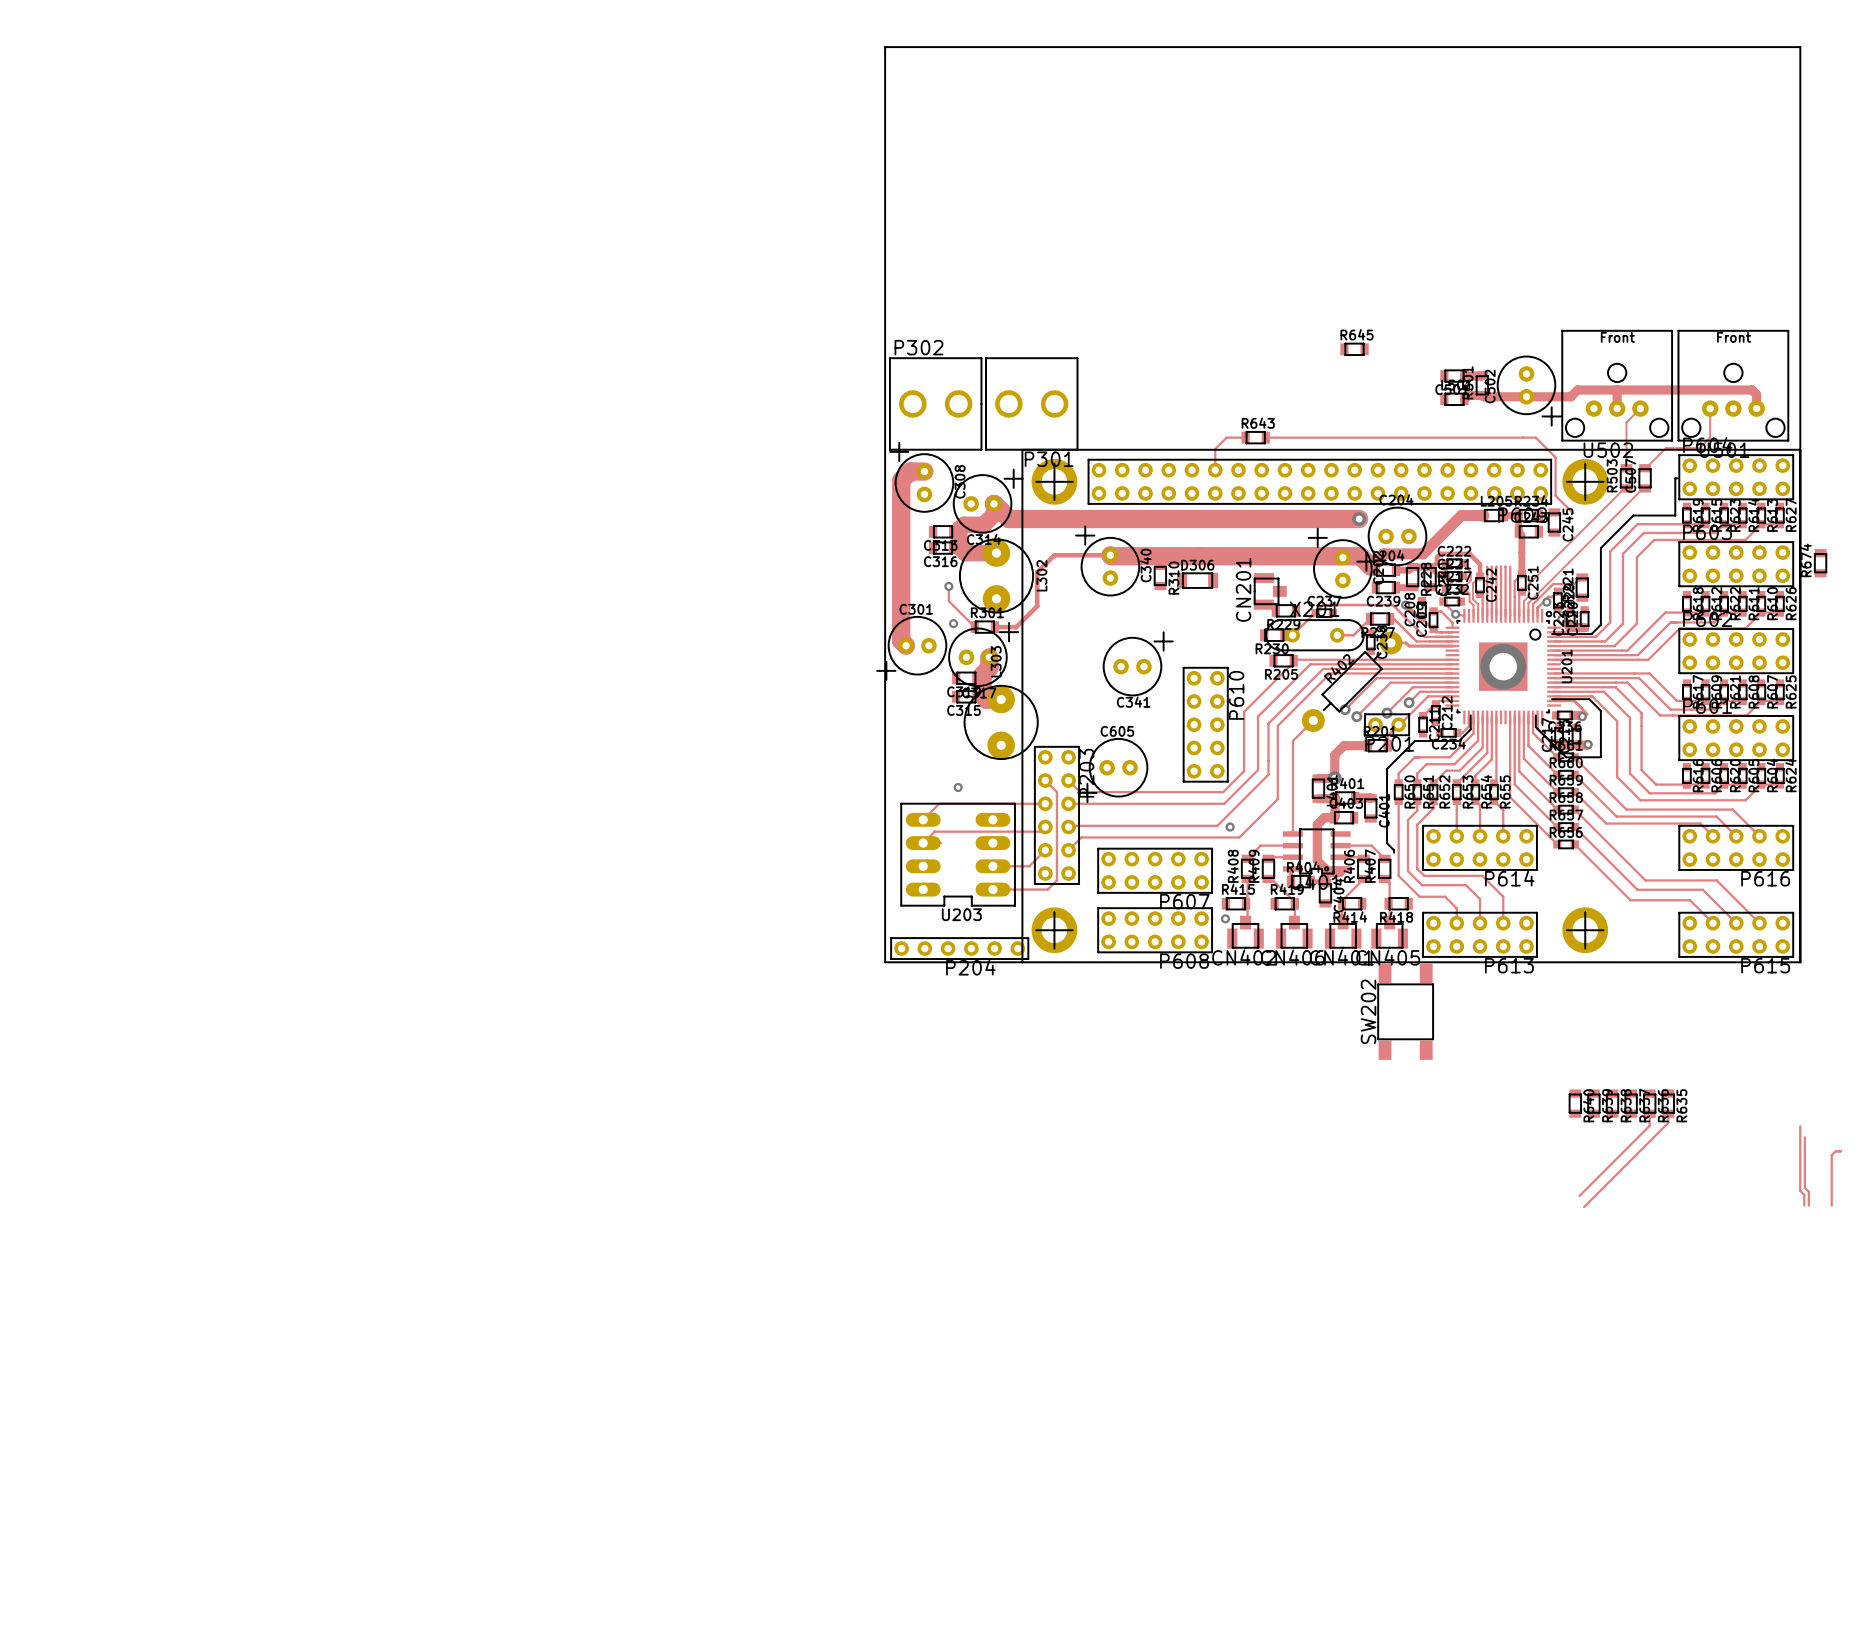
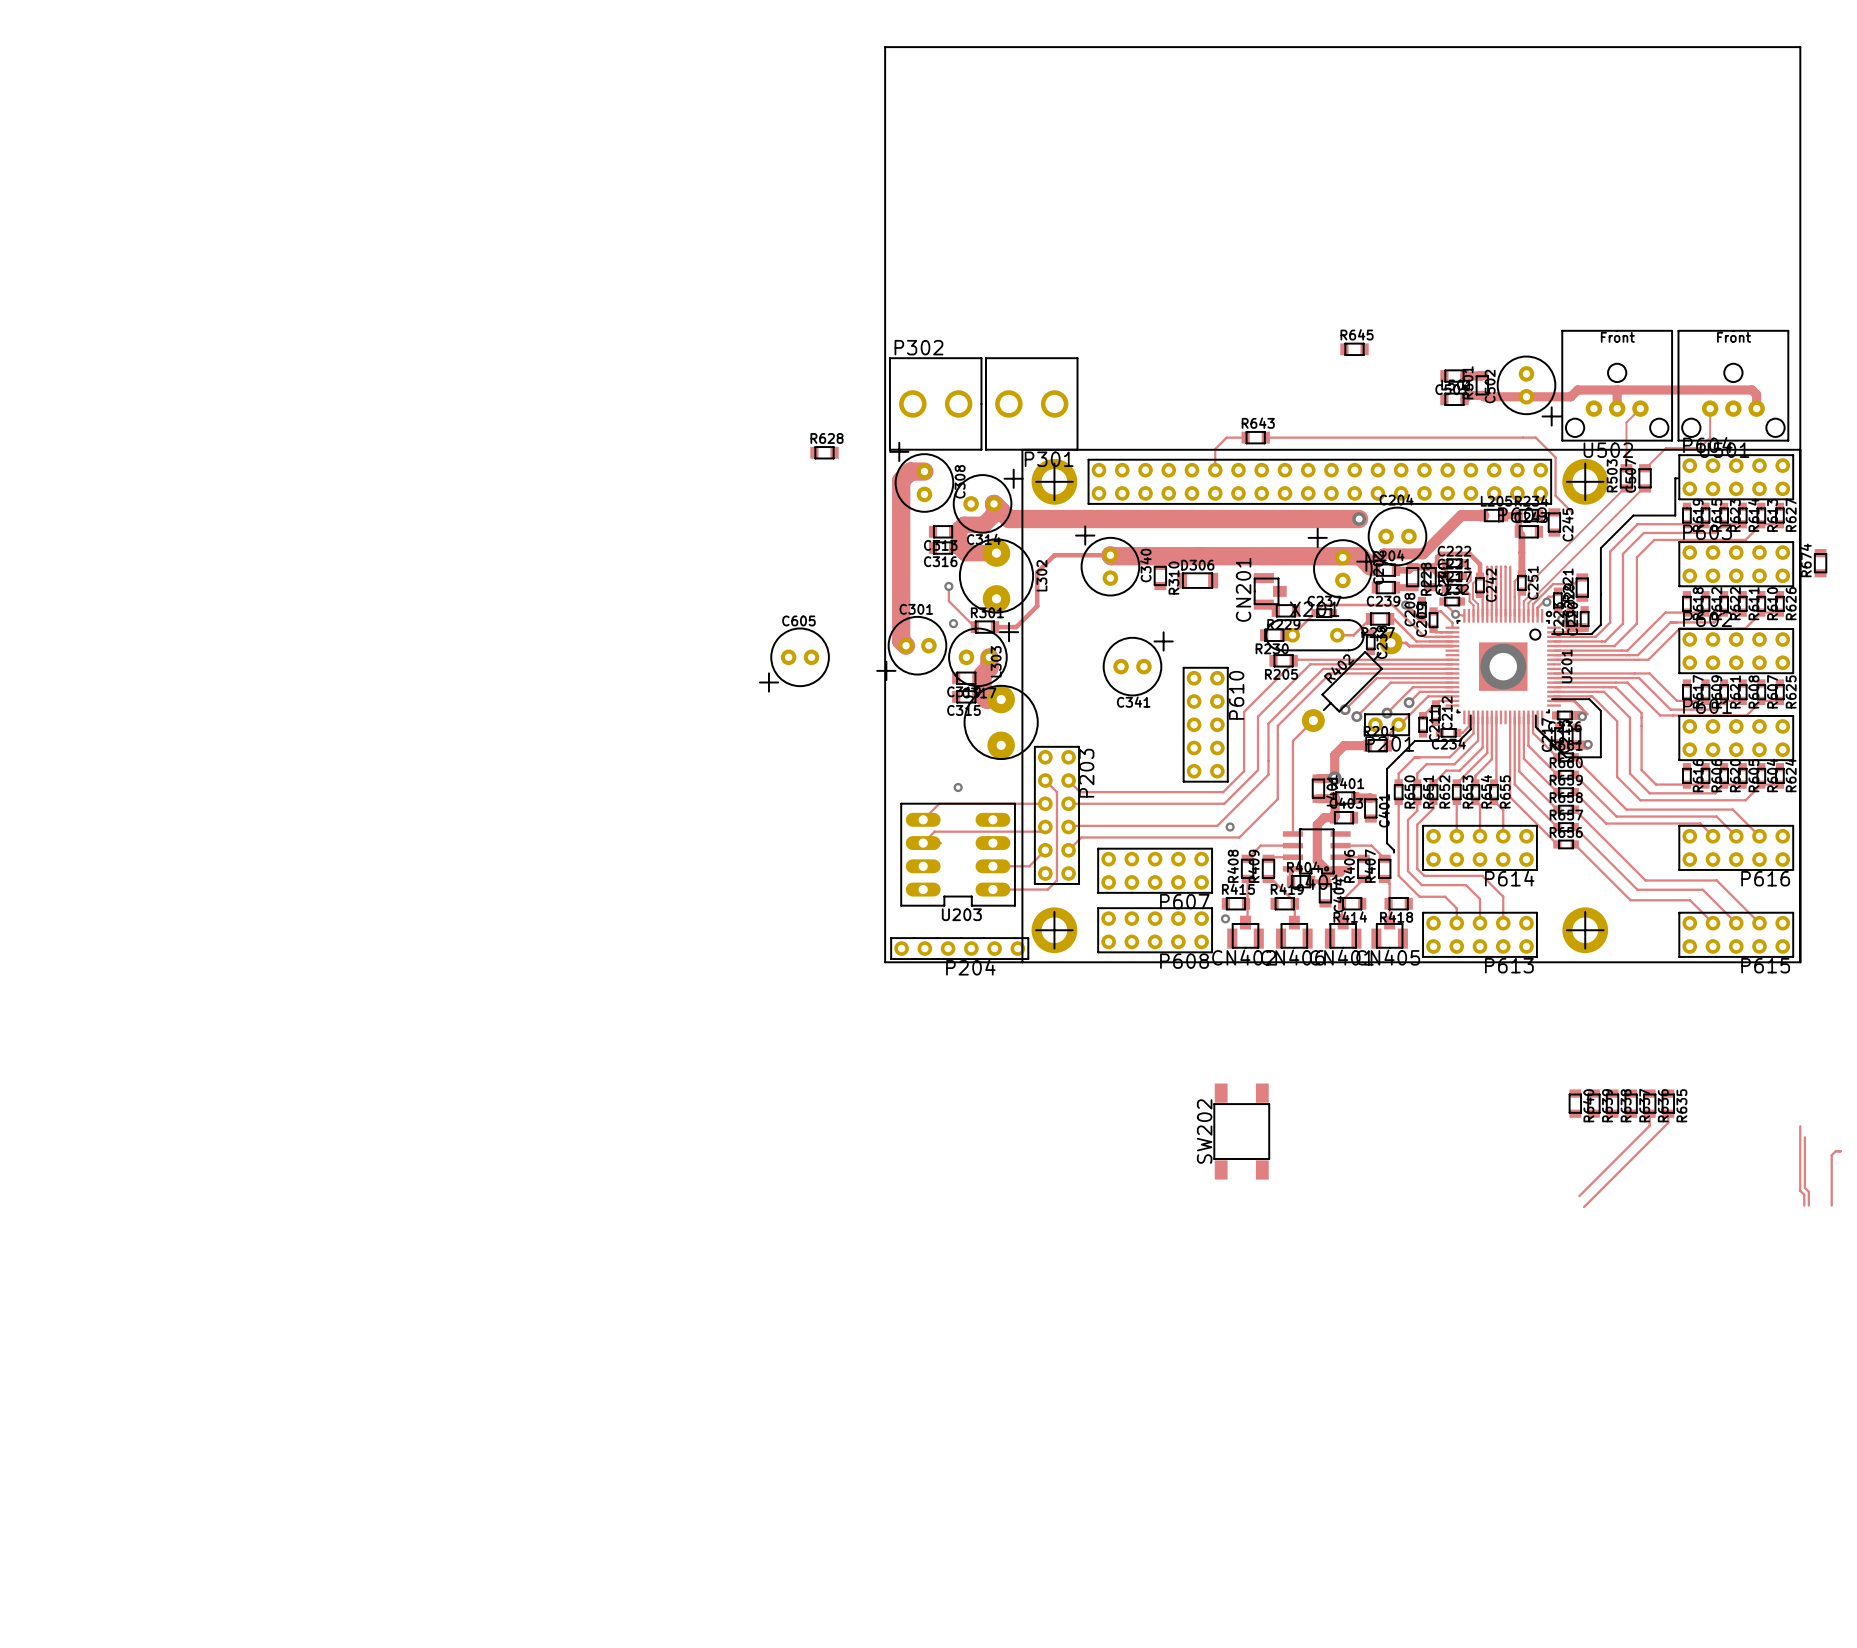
R628: none -> (824, 452)
C605 position: (1112, 770) -> (794, 660)
SW202 position: (1405, 1011) -> (1241, 1131)

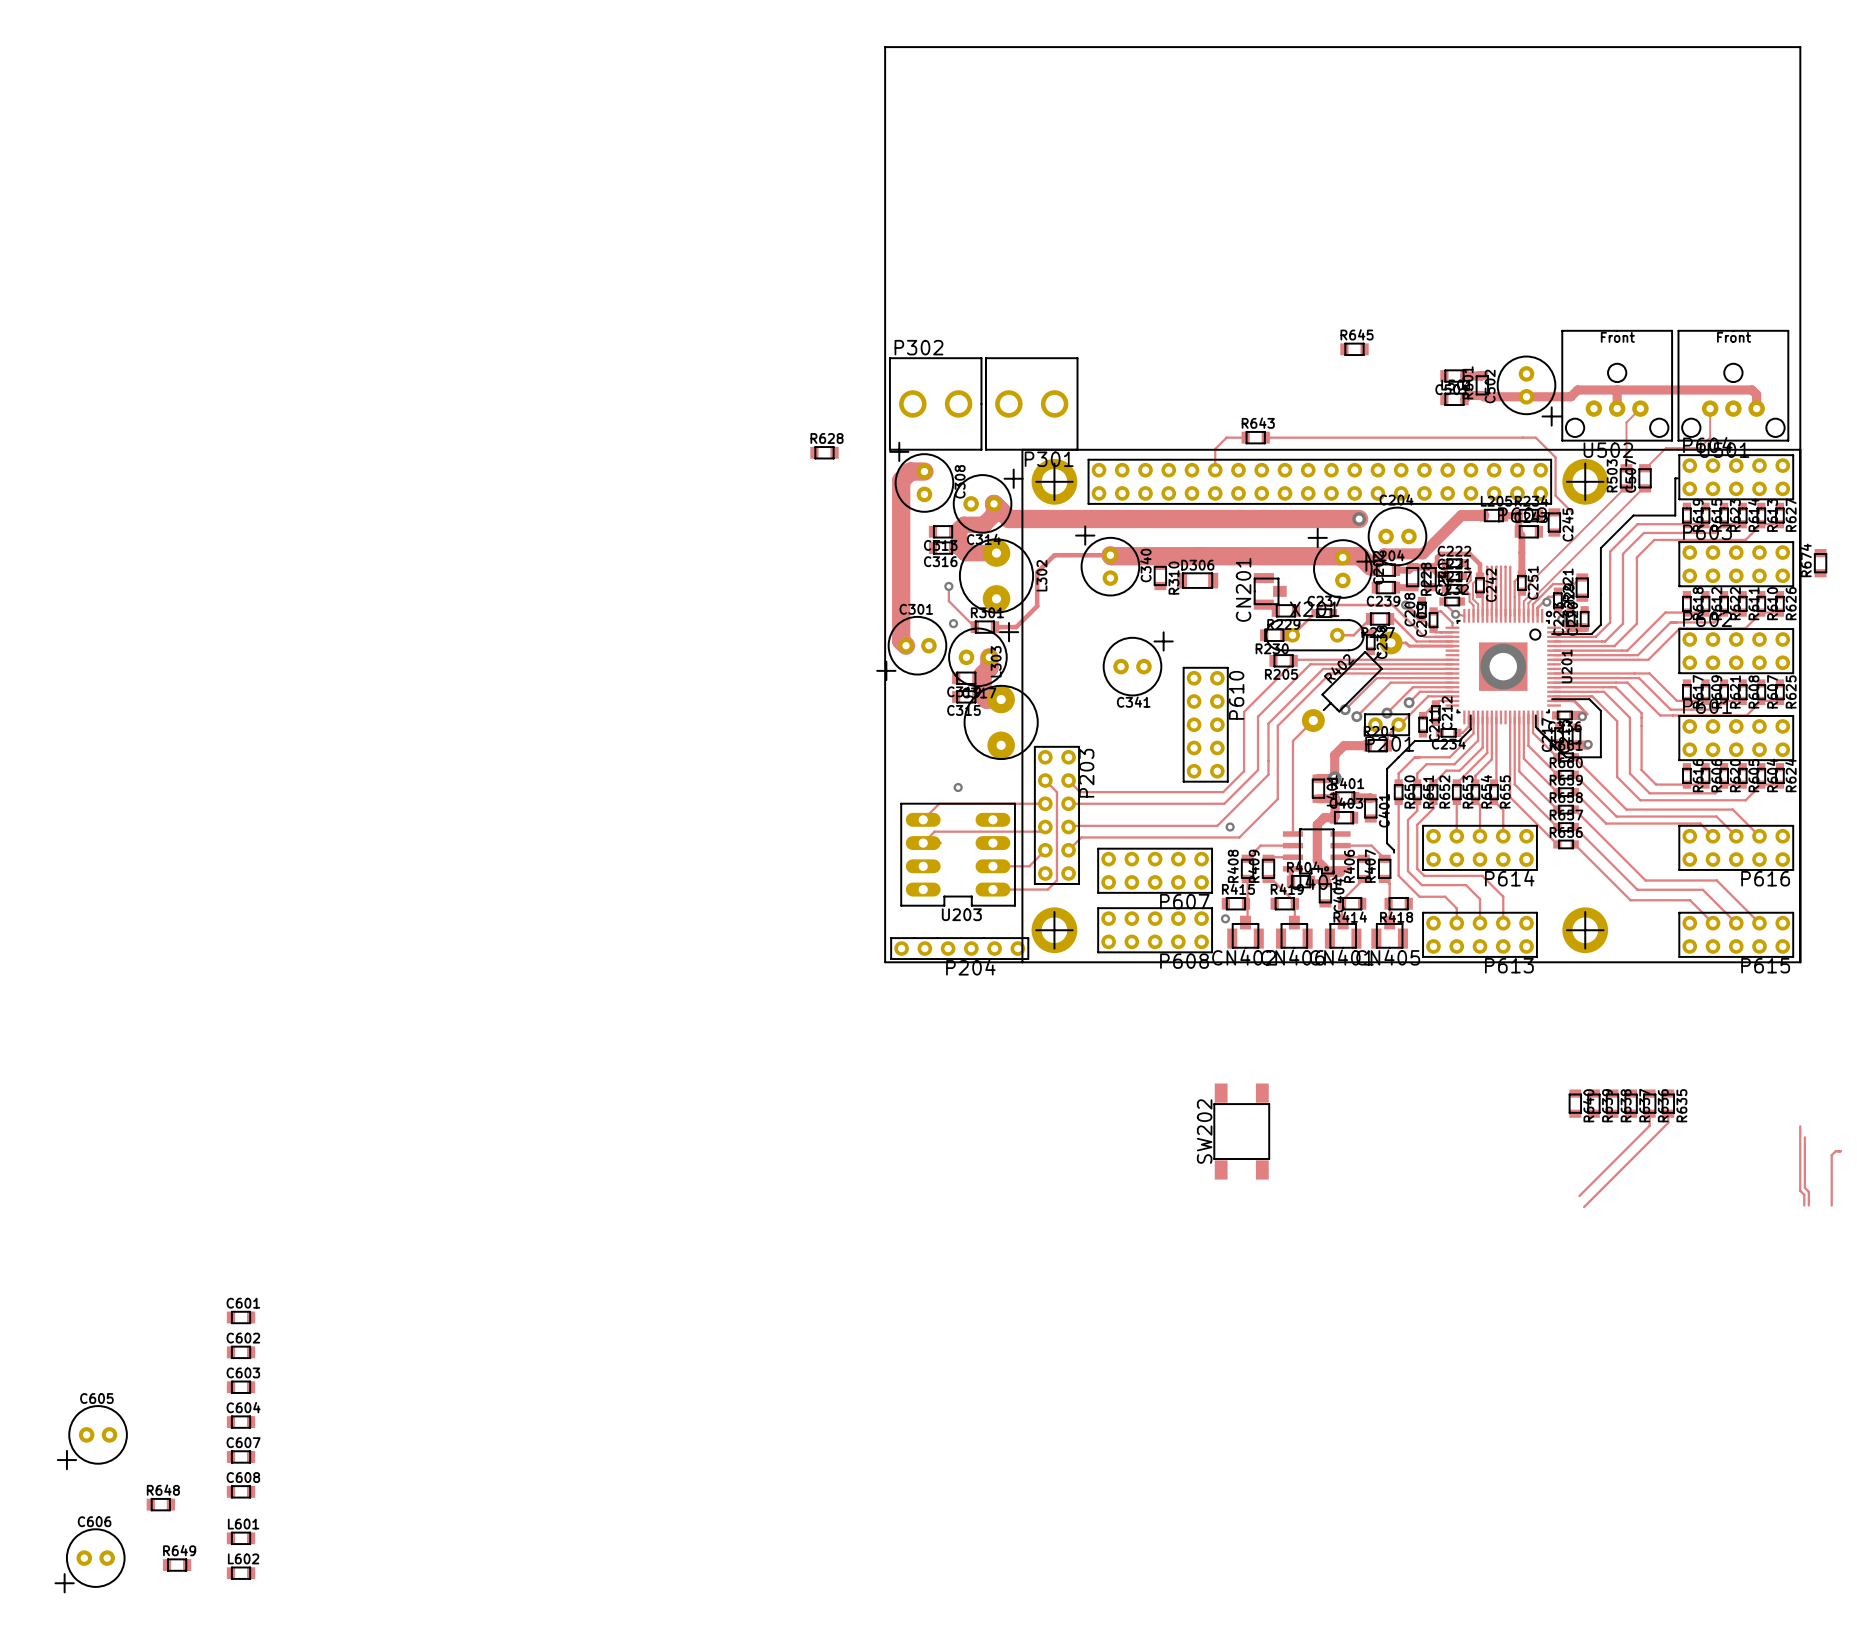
C605 position: (794, 660) -> (92, 1437)
C601: none -> (241, 1317)
C602: none -> (241, 1352)
C603: none -> (241, 1387)
C604: none -> (241, 1422)
C607: none -> (241, 1456)
C608: none -> (241, 1491)
R648: none -> (160, 1504)
L601: none -> (241, 1538)
C606: none -> (90, 1560)
R649: none -> (177, 1565)
L602: none -> (241, 1573)

